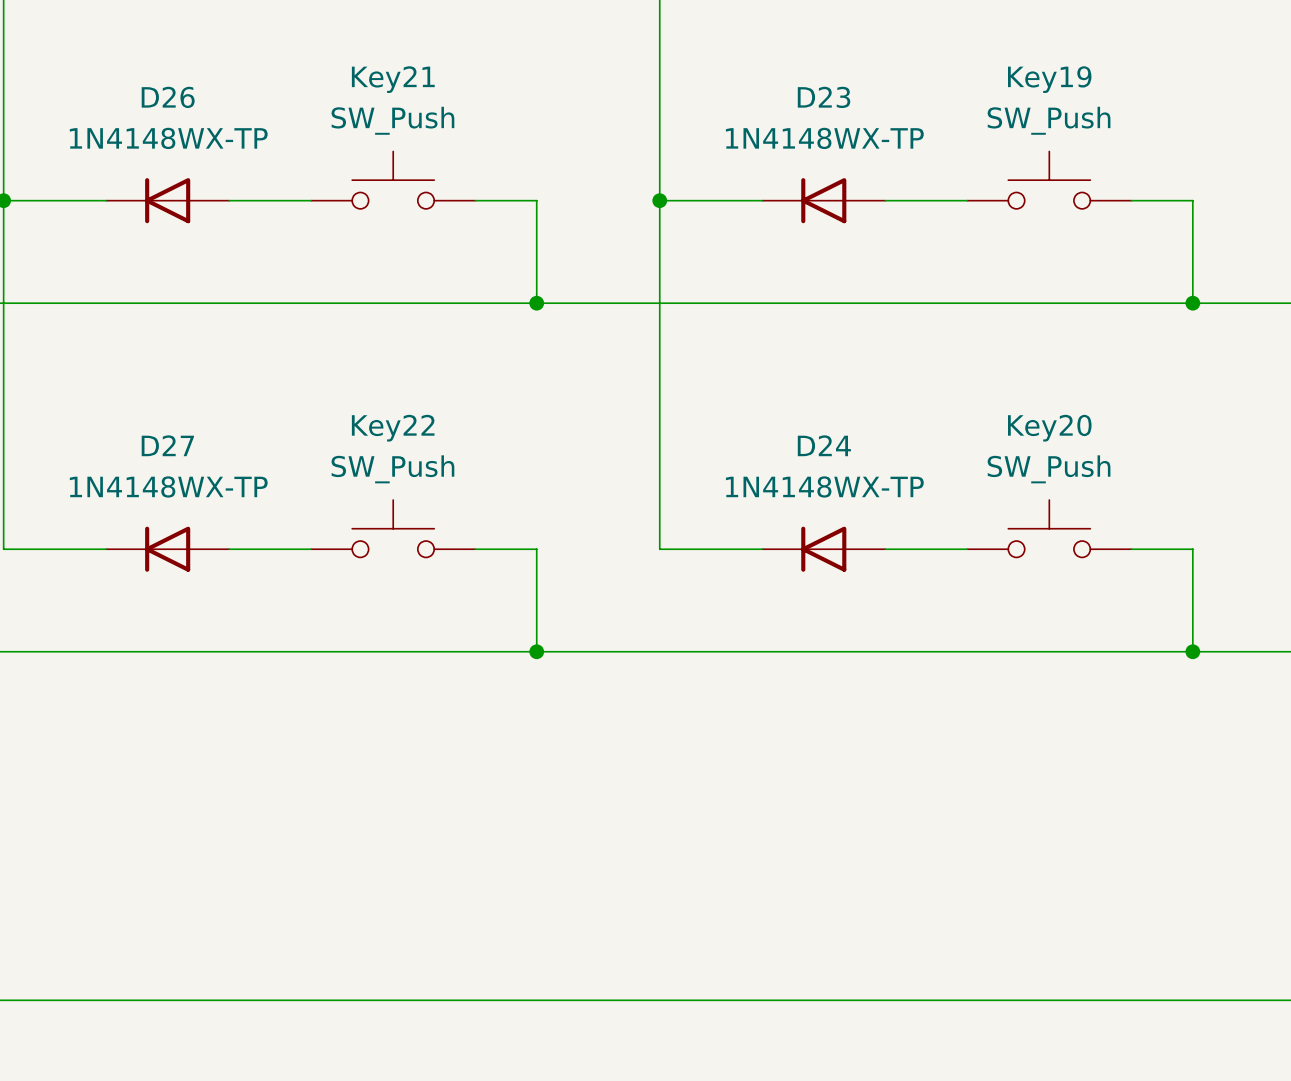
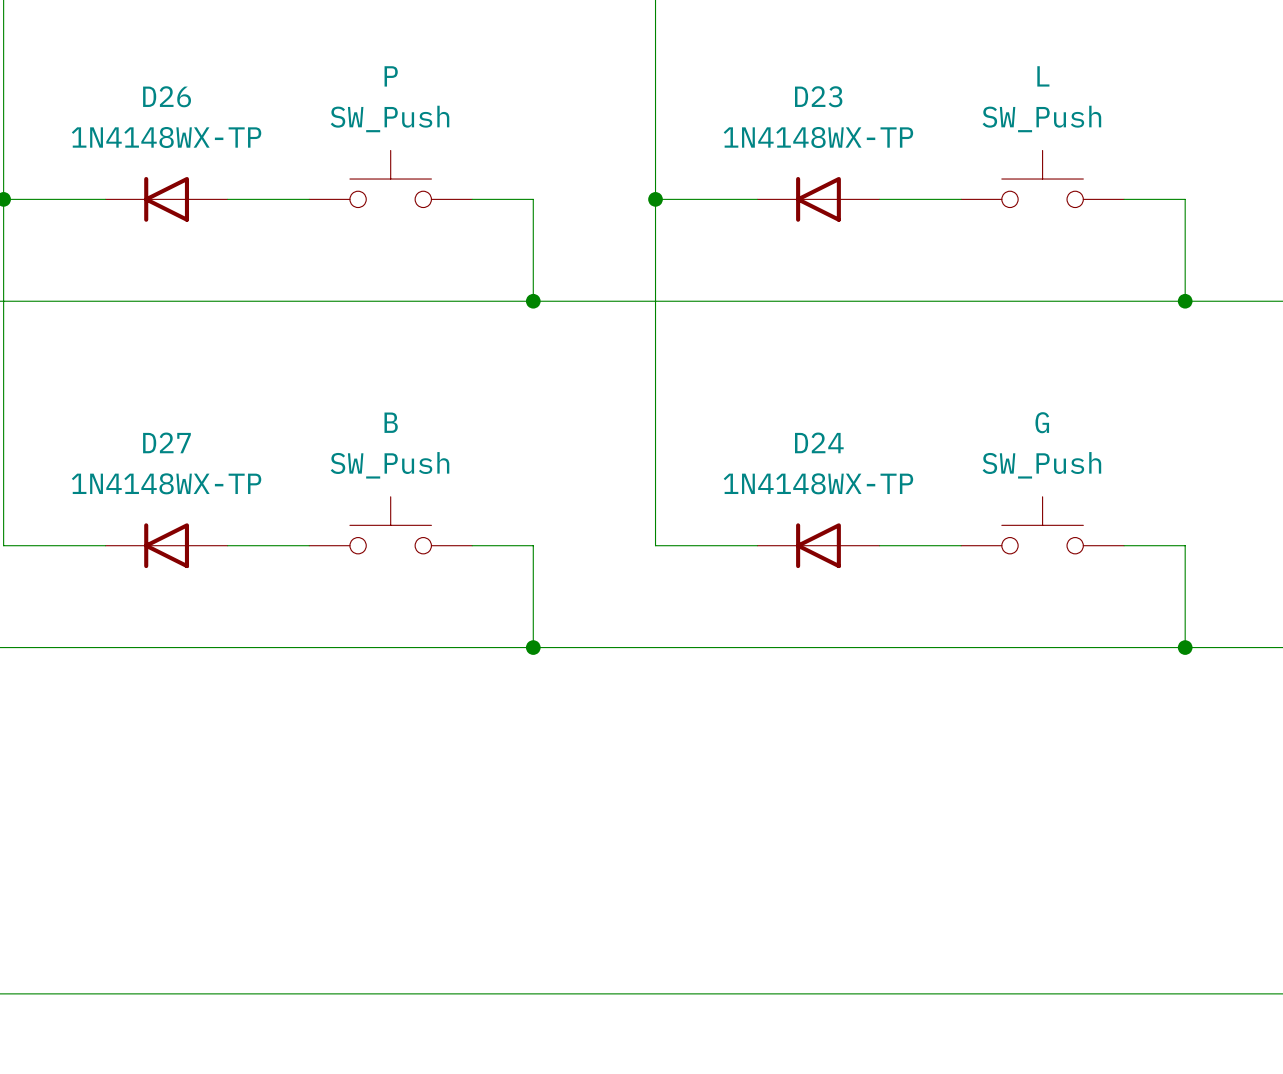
Key21 name: Key21 (393, 79) -> P (391, 76)
Key19 name: Key19 (1049, 79) -> L (1043, 76)
Key22 name: Key22 (393, 428) -> B (391, 422)
Key20 name: Key20 (1049, 428) -> G (1042, 422)

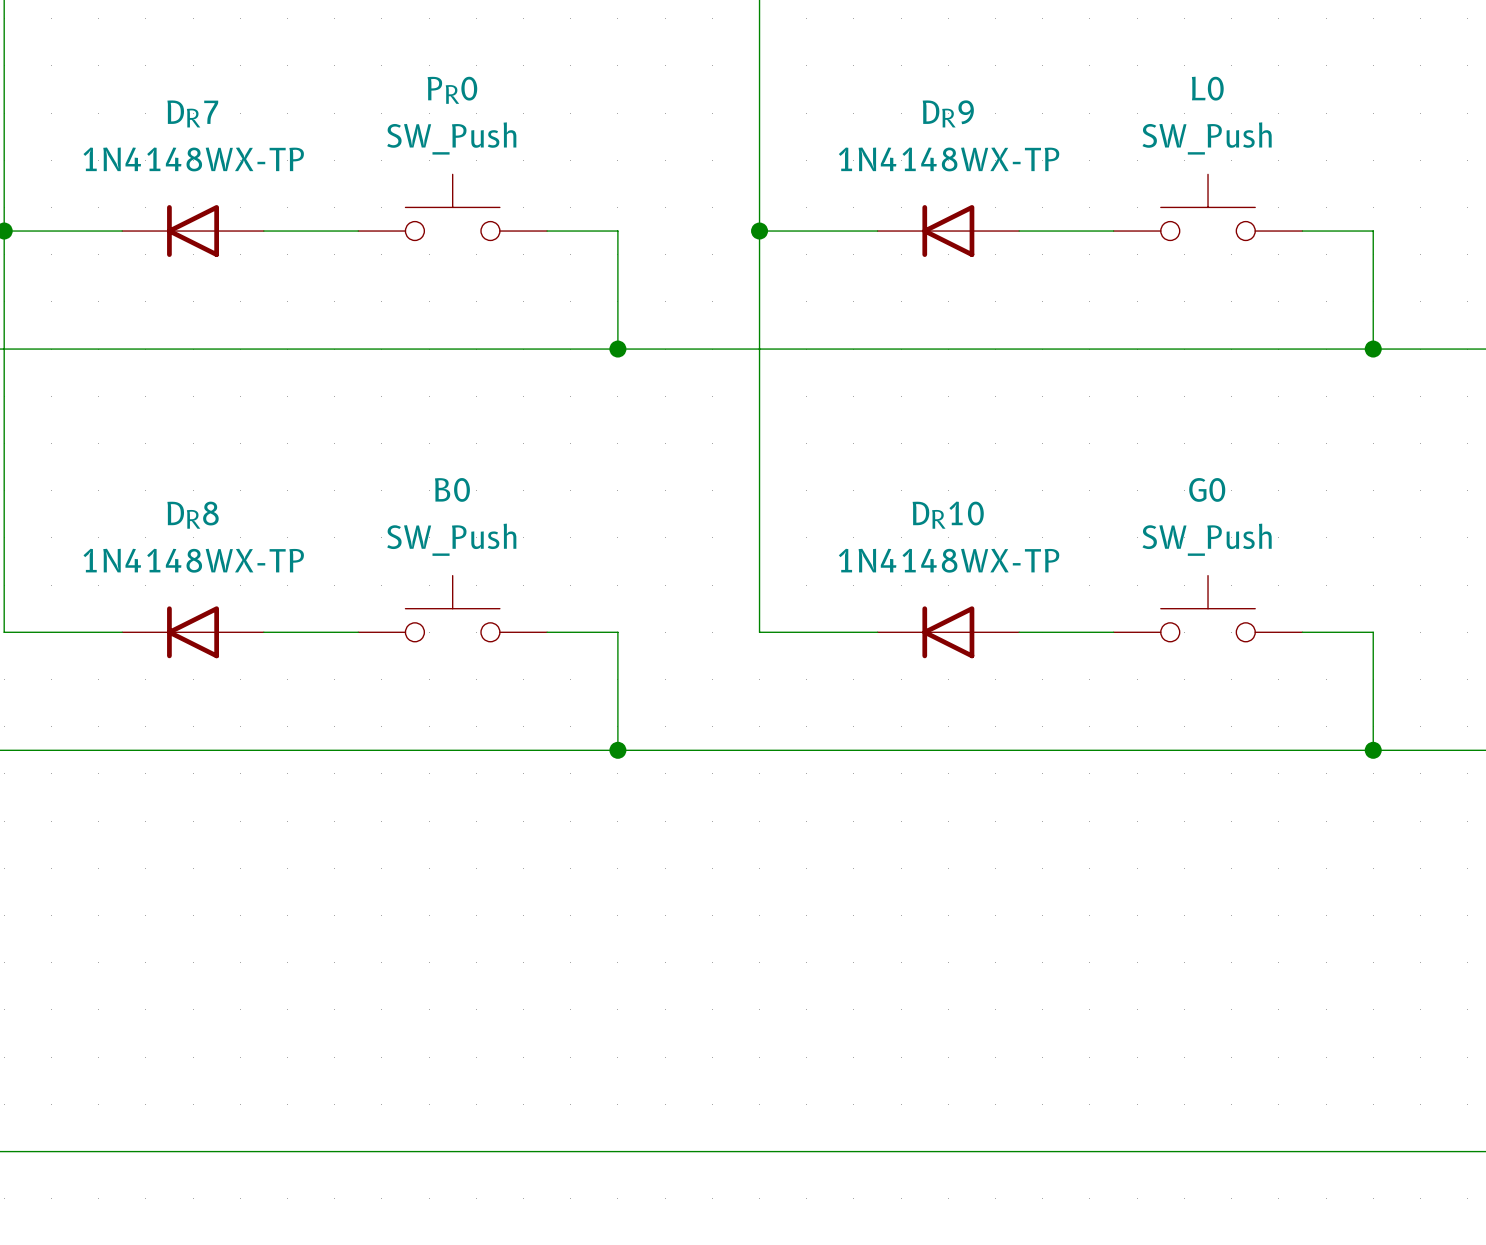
P name: P (391, 76) -> PR0 (452, 90)
L name: L (1043, 76) -> L0 (1207, 88)
D26 name: D26 (167, 96) -> DR7 (192, 113)
D23 name: D23 (818, 96) -> DR9 (948, 113)
B name: B (391, 422) -> B0 (452, 489)
G name: G (1042, 422) -> G0 (1207, 489)
D27 name: D27 (166, 442) -> DR8 (193, 515)
D24 name: D24 (819, 442) -> DR10 (948, 515)

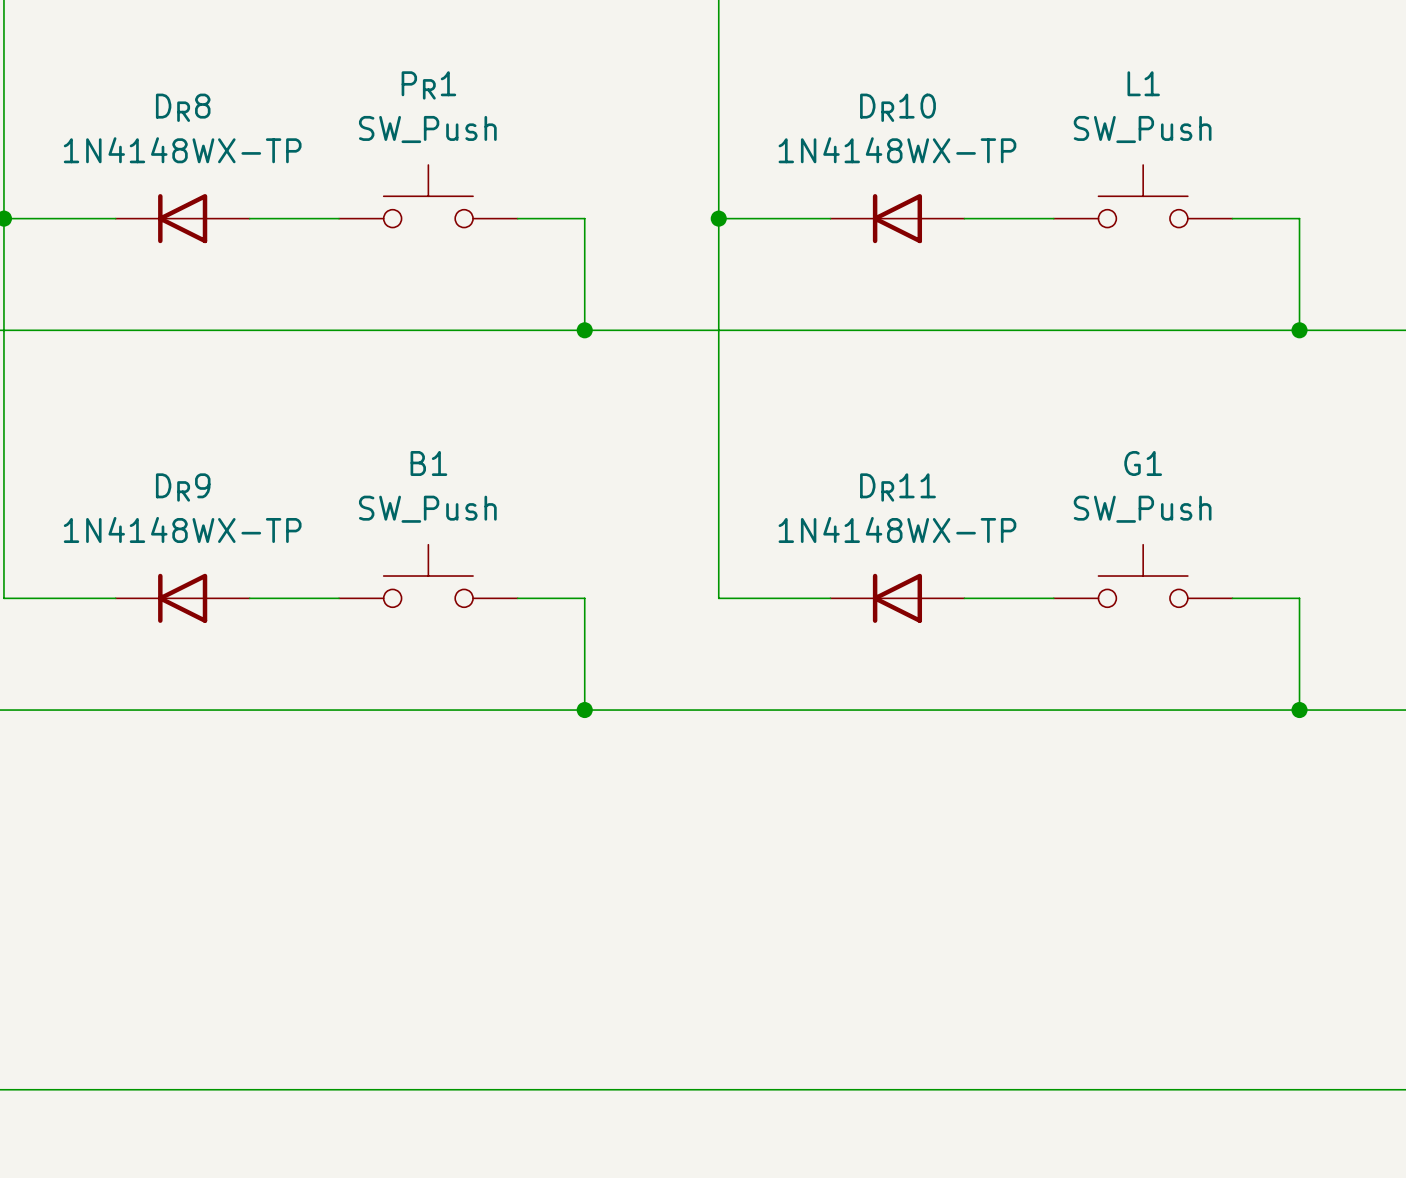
L0 name: L0 (1207, 88) -> L1 (1143, 83)
PR0 name: PR0 (452, 90) -> PR1 (428, 85)
DR7 name: DR7 (192, 113) -> DR8 (183, 107)
DR9 name: DR9 (948, 113) -> DR10 (897, 107)
B0 name: B0 (452, 489) -> B1 (428, 463)
G0 name: G0 (1207, 489) -> G1 (1143, 463)
DR8 name: DR8 (193, 515) -> DR9 (183, 487)
DR10 name: DR10 (948, 515) -> DR11 (897, 487)

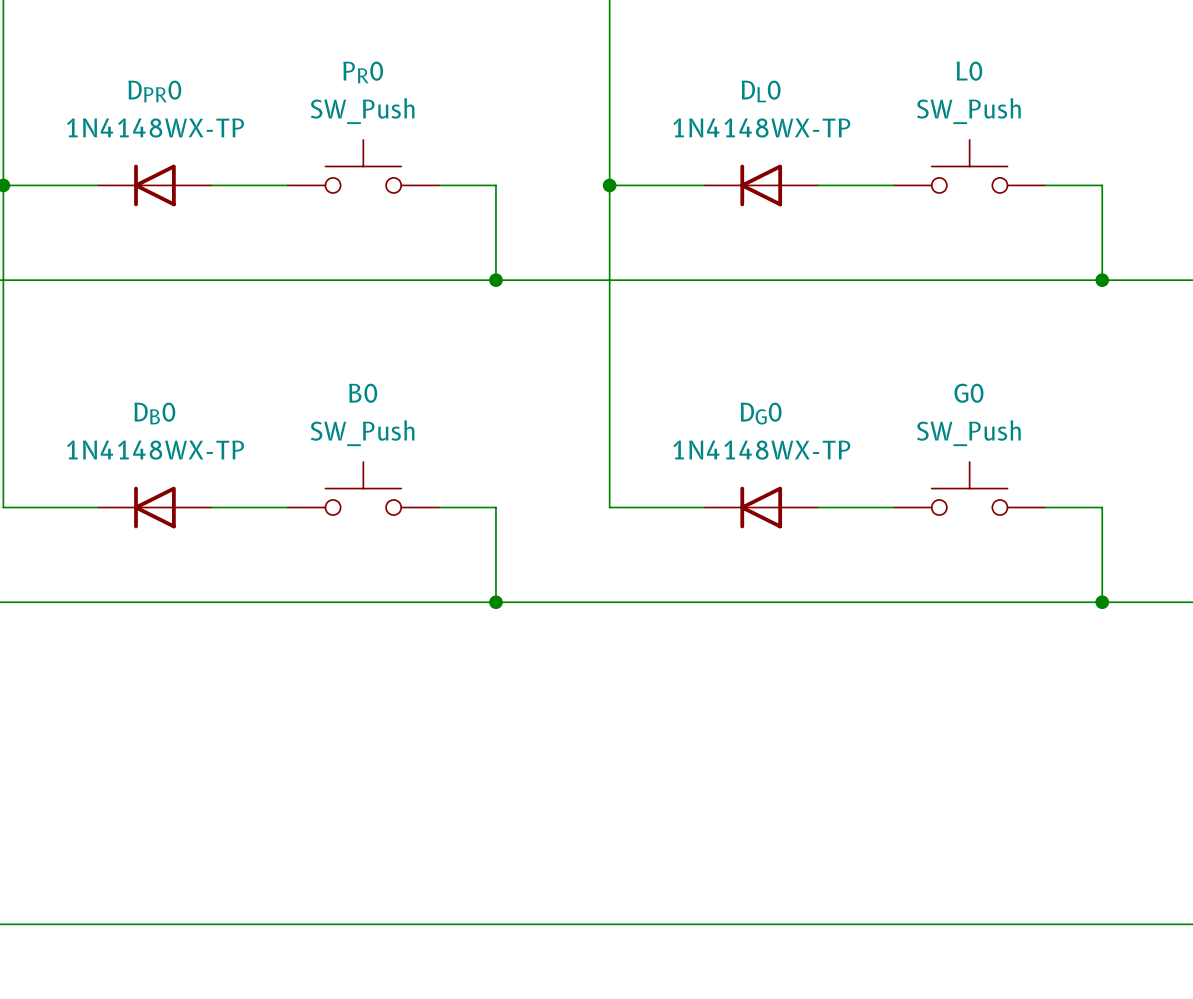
L1 name: L1 (1143, 83) -> L0 (969, 71)
PR1 name: PR1 (428, 85) -> PR0 (363, 72)
DR8 name: DR8 (183, 107) -> DPR0 (154, 91)
DR10 name: DR10 (897, 107) -> DL0 (761, 91)
B1 name: B1 (428, 463) -> B0 (363, 393)
G1 name: G1 (1143, 463) -> G0 (968, 393)
DR9 name: DR9 (183, 487) -> DB0 (154, 413)
DR11 name: DR11 (897, 487) -> DG0 (761, 413)

